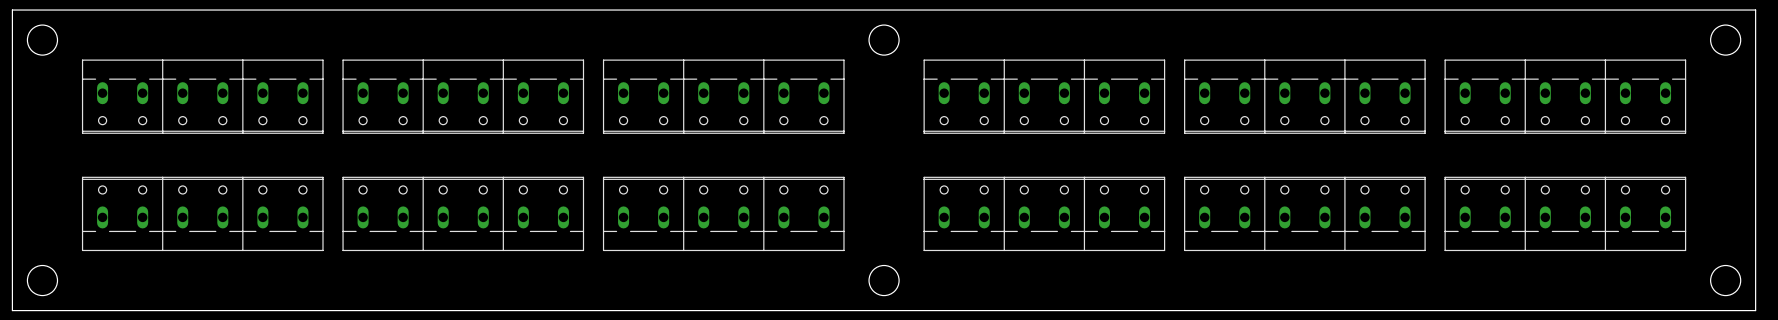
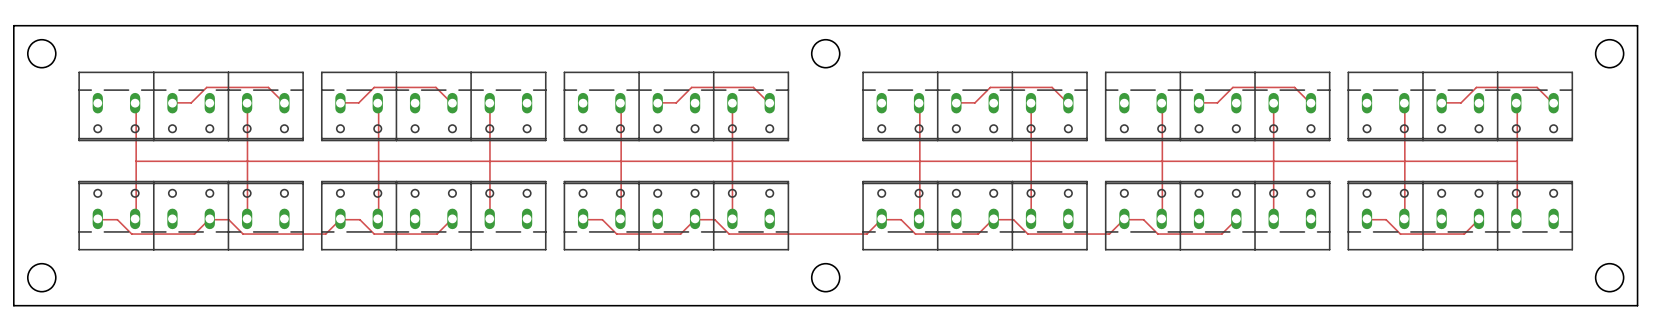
track: none -> (135, 103) (135, 218)
track: none -> (172, 103) (191, 102) (206, 87) (268, 87) (284, 103)
track: none -> (247, 103) (247, 218)
track: none -> (340, 103) (358, 102) (374, 87) (435, 87) (452, 103)
track: none -> (377, 103) (377, 218)
track: none -> (489, 103) (489, 218)
track: none -> (620, 103) (620, 218)
track: none -> (657, 103) (676, 102) (691, 87) (753, 87) (769, 103)
track: none -> (732, 103) (732, 218)
track: none -> (919, 103) (919, 218)
track: none -> (956, 103) (974, 102) (990, 87) (1052, 87) (1068, 103)
track: none -> (1031, 103) (1031, 218)
track: none -> (1161, 103) (1161, 218)
track: none -> (1199, 103) (1217, 102) (1232, 87) (1294, 87) (1311, 103)
track: none -> (1273, 103) (1273, 218)
track: none -> (1404, 103) (1404, 218)
track: none -> (1441, 103) (1461, 102) (1476, 87) (1537, 87) (1553, 103)
track: none -> (1516, 103) (1516, 218)
track: none -> (136, 161) (1517, 161)
track: none -> (97, 218) (117, 219) (131, 234) (194, 234) (209, 218) (228, 219) (243, 234) (325, 234) (340, 218) (359, 219) (374, 234) (437, 234) (452, 218)
track: none -> (583, 218) (602, 219) (616, 234) (680, 234) (695, 218) (714, 219) (729, 234) (866, 234) (881, 218) (901, 219) (915, 234) (978, 234) (993, 218) (1013, 219) (1027, 234) (1109, 234) (1124, 218) (1143, 219) (1157, 234) (1221, 234) (1236, 218)
track: none -> (1367, 218) (1386, 219) (1400, 234) (1464, 234) (1478, 218)

